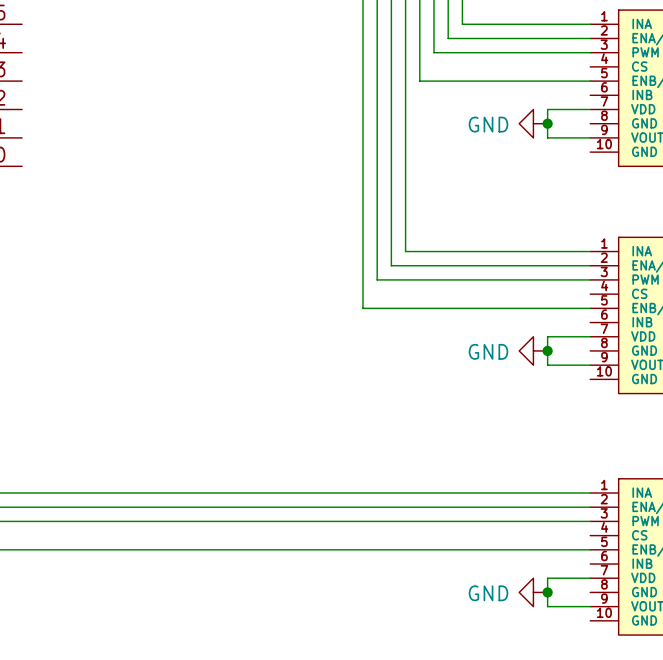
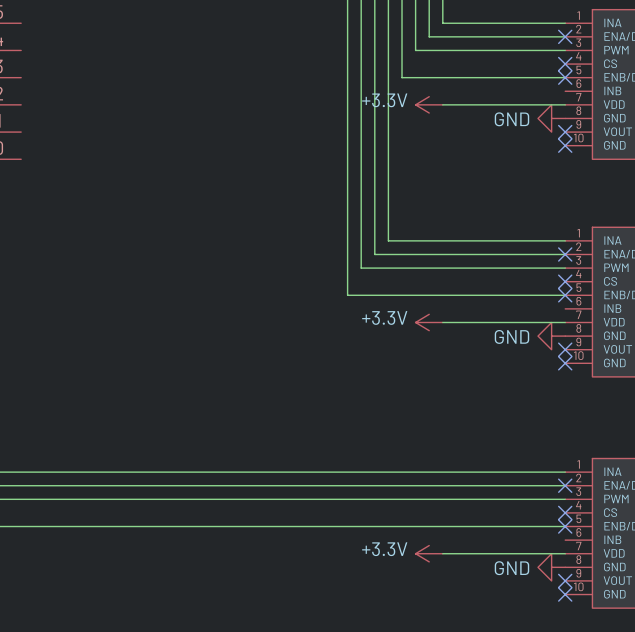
no-connect mark: none -> (565, 36)
no-connect mark: none -> (565, 64)
no-connect mark: none -> (565, 77)
power symbol: none -> +3.3V (429, 104)
wire: (547, 109) (547, 137) (590, 137) -> (524, 104) (442, 104)
power symbol position: GND (533, 123) -> GND (551, 118)
junction: (547, 123) -> none
no-connect mark: none -> (565, 132)
no-connect mark: none -> (565, 145)
no-connect mark: none -> (565, 254)
no-connect mark: none -> (565, 281)
no-connect mark: none -> (565, 295)
power symbol: none -> +3.3V (429, 322)
wire: (547, 336) (547, 365) (590, 365) -> (524, 322) (442, 322)
power symbol position: GND (533, 350) -> GND (551, 336)
junction: (547, 350) -> none
no-connect mark: none -> (565, 349)
no-connect mark: none -> (565, 363)
no-connect mark: none -> (565, 485)
no-connect mark: none -> (565, 512)
no-connect mark: none -> (565, 526)
power symbol: none -> +3.3V (429, 553)
wire: (547, 578) (547, 606) (590, 606) -> (524, 553) (442, 553)
power symbol position: GND (533, 592) -> GND (551, 567)
junction: (547, 592) -> none
no-connect mark: none -> (565, 580)
no-connect mark: none -> (565, 594)

